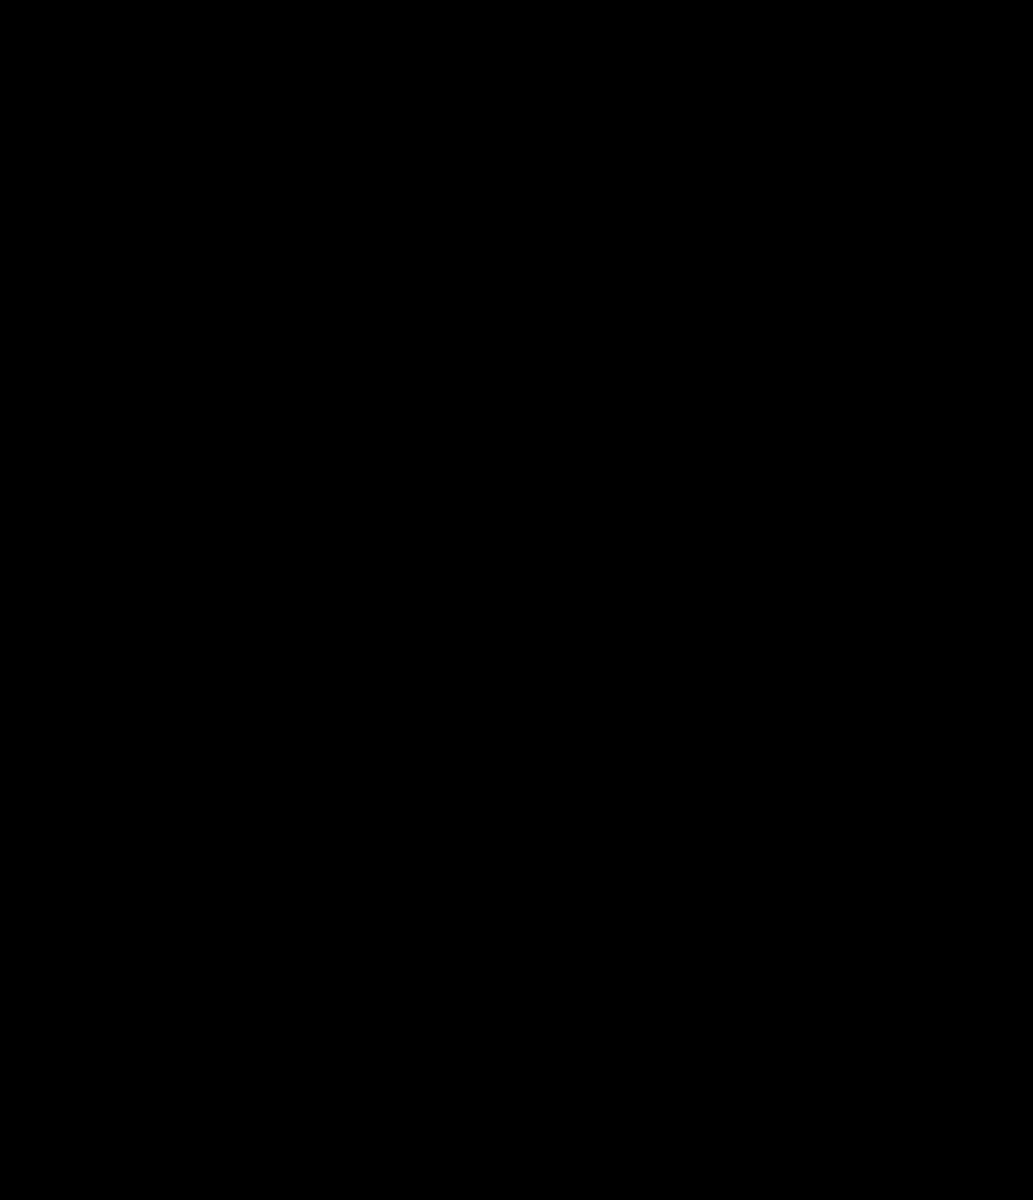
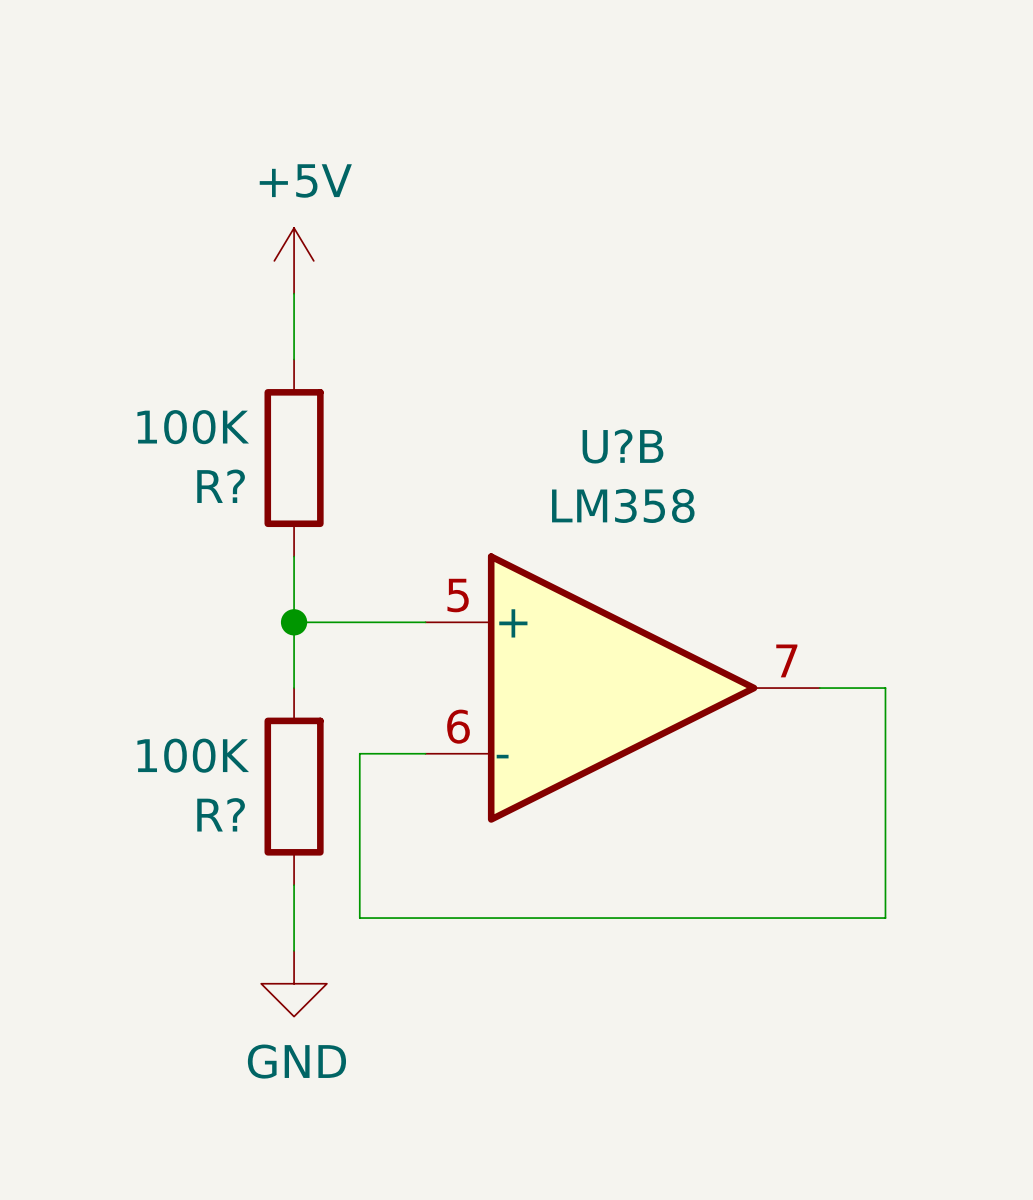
power symbol: none -> +5V (294, 260)
wire: none -> (294, 293) (294, 359)
R?: none -> 100K (294, 458)
wire: none -> (294, 556) (294, 688)
wire: none -> (294, 622) (425, 622)
junction: none -> (294, 622)
U?B: none -> LM358 (622, 688)
wire: none -> (819, 688) (885, 688) (885, 918) (359, 918) (359, 753) (425, 753)
R?: none -> 100K (294, 786)
wire: none -> (294, 885) (294, 950)
power symbol: none -> GND (294, 983)

